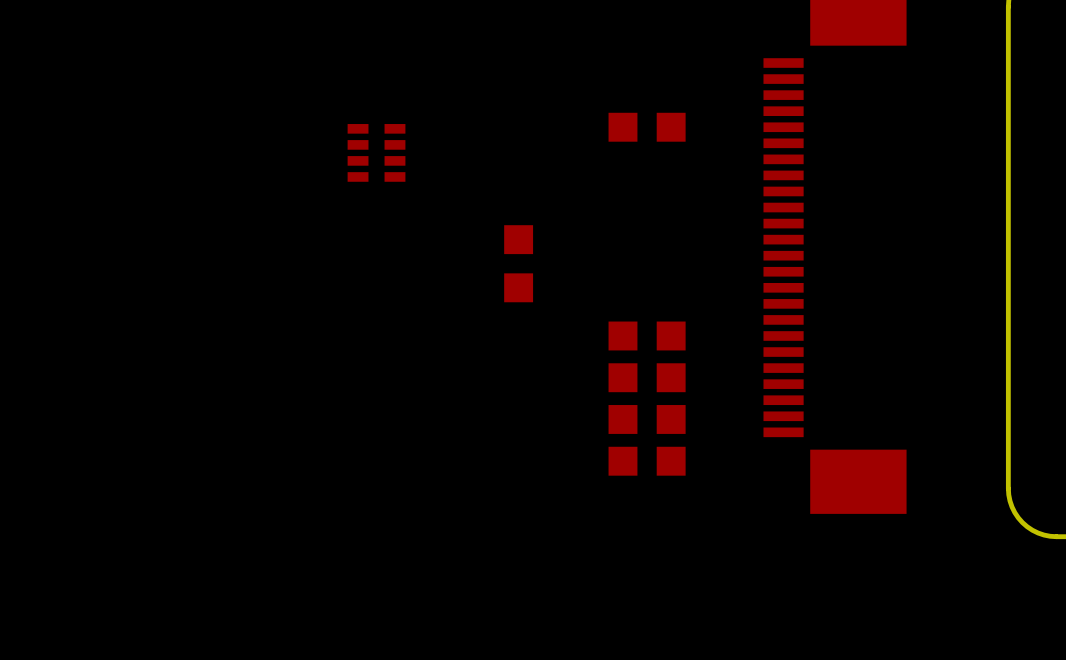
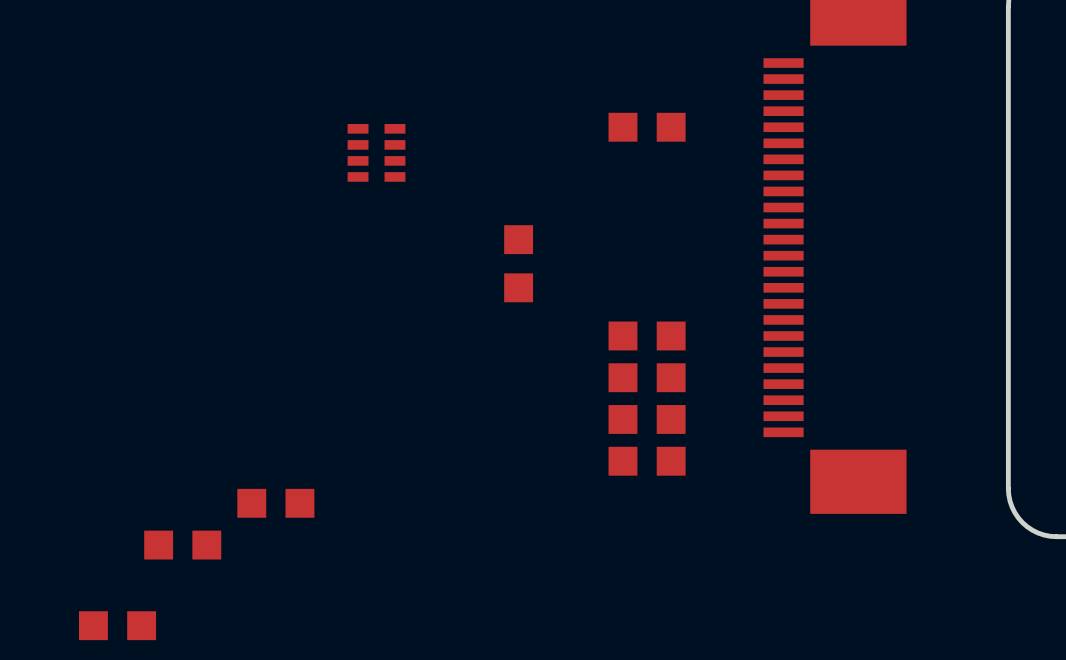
part: none -> (275, 503)
part: none -> (182, 545)
part: none -> (117, 625)

